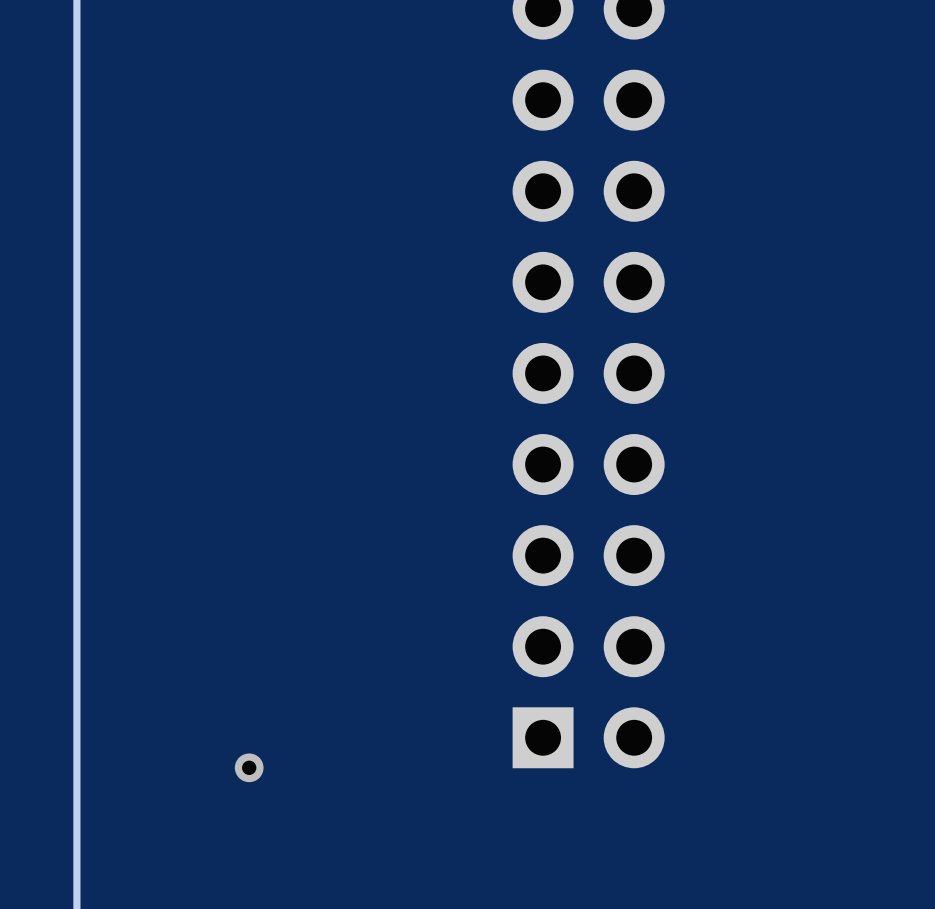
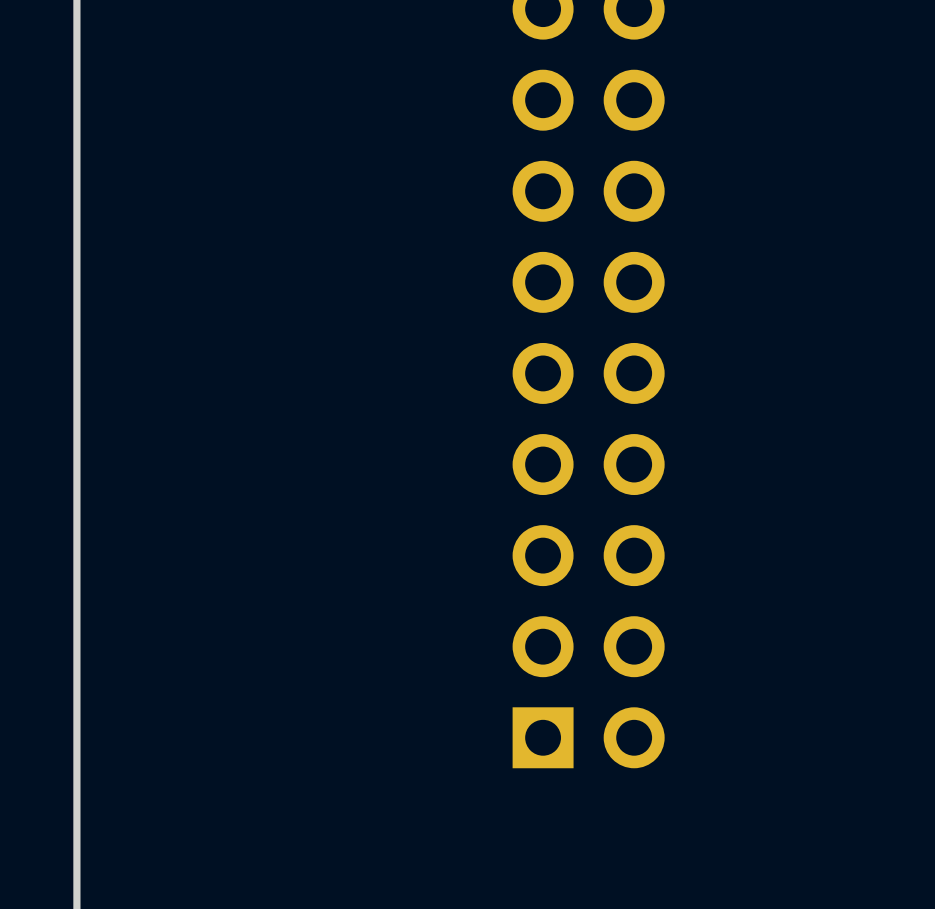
via: (249, 767) -> none

